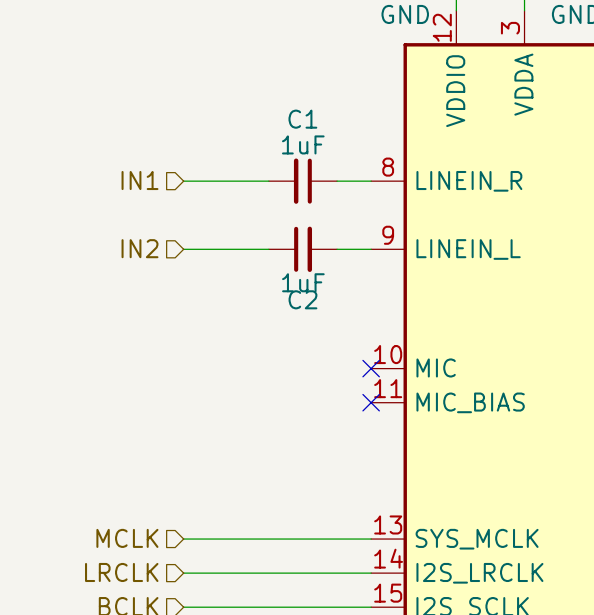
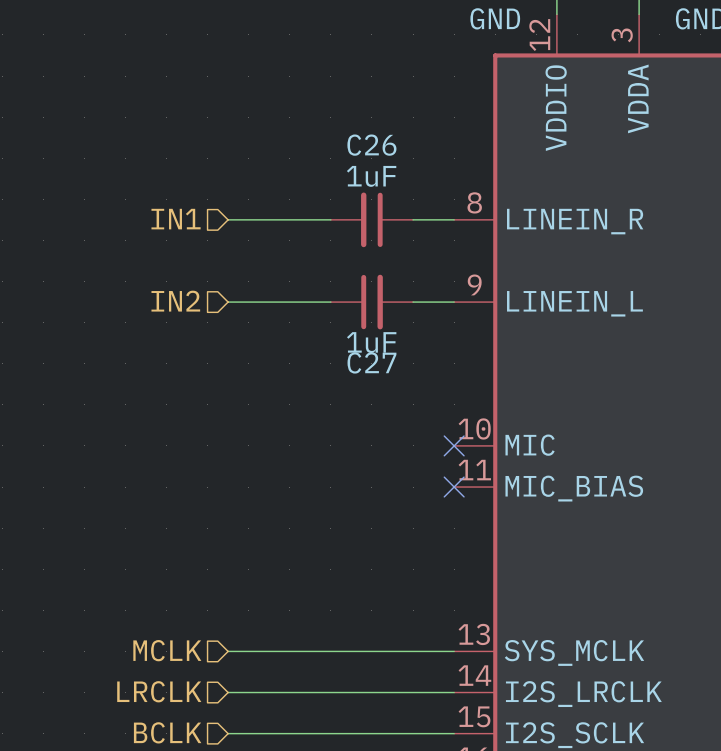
C1 name: C1 (302, 119) -> C26 (371, 145)
C2 name: C2 (302, 299) -> C27 (371, 362)

